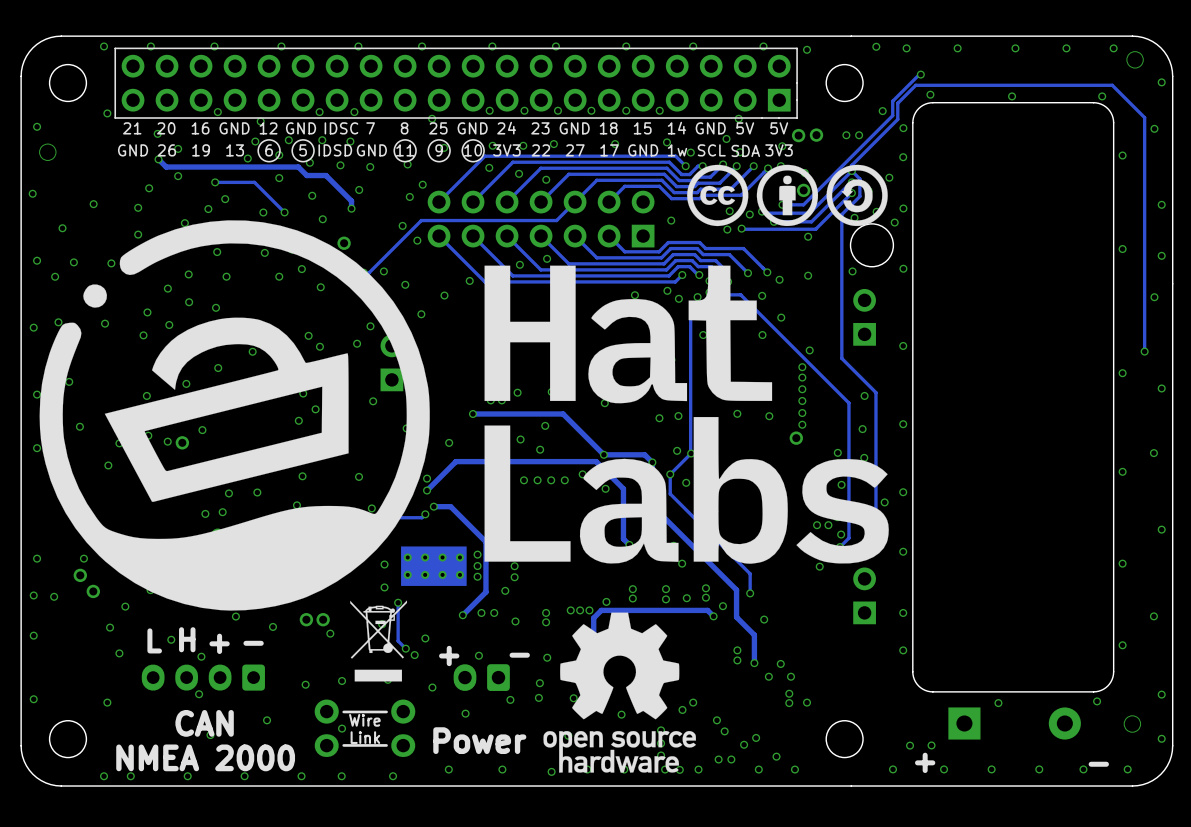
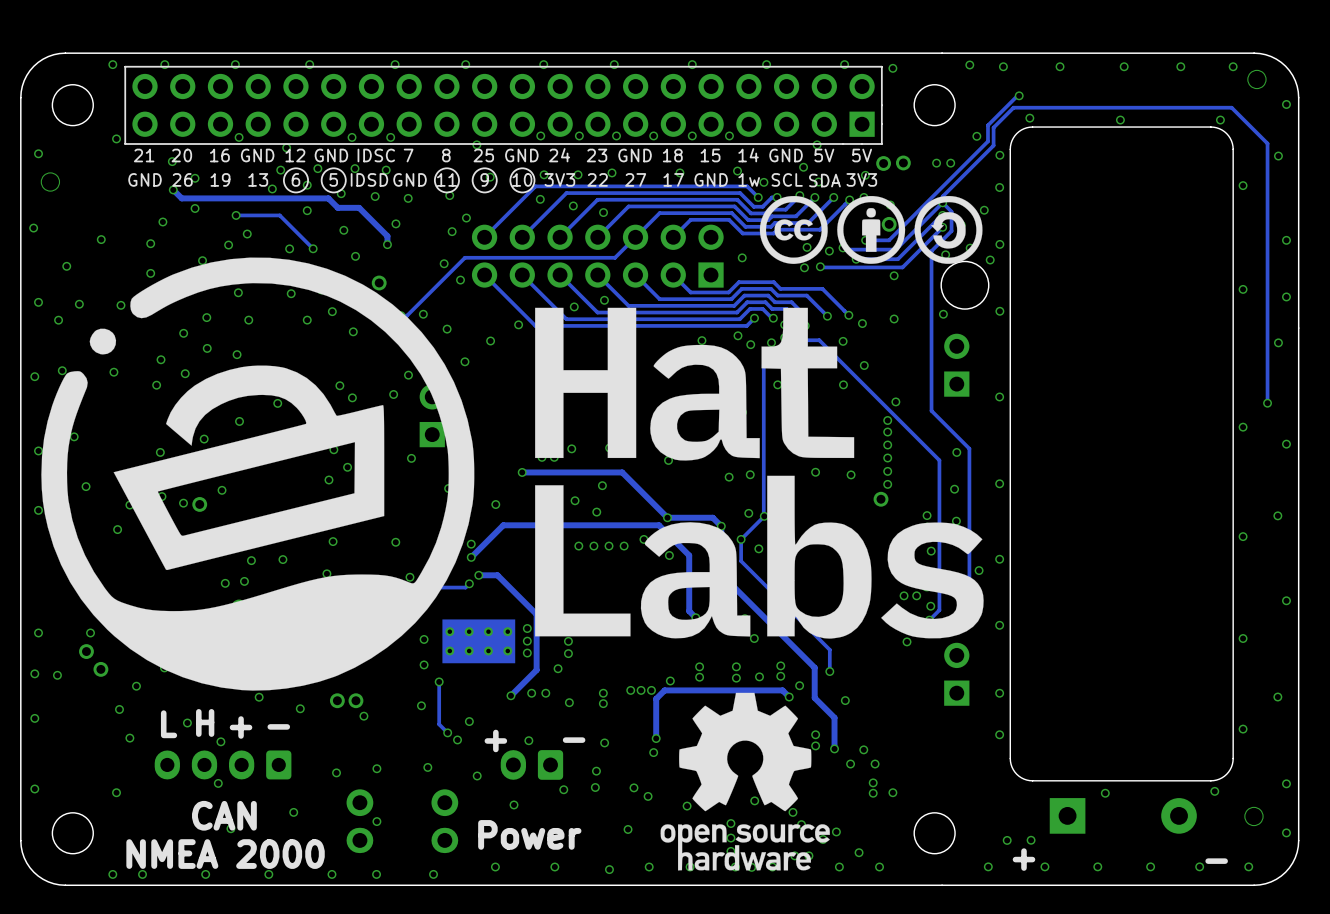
drawing: [350, 600, 408, 682] -> none
drawing position: (619, 692) -> (745, 781)
line: (386, 711) (343, 711) -> none
text: Wire (364, 720) -> none
text: Link (365, 737) -> none
line: (386, 745) (343, 745) -> none

